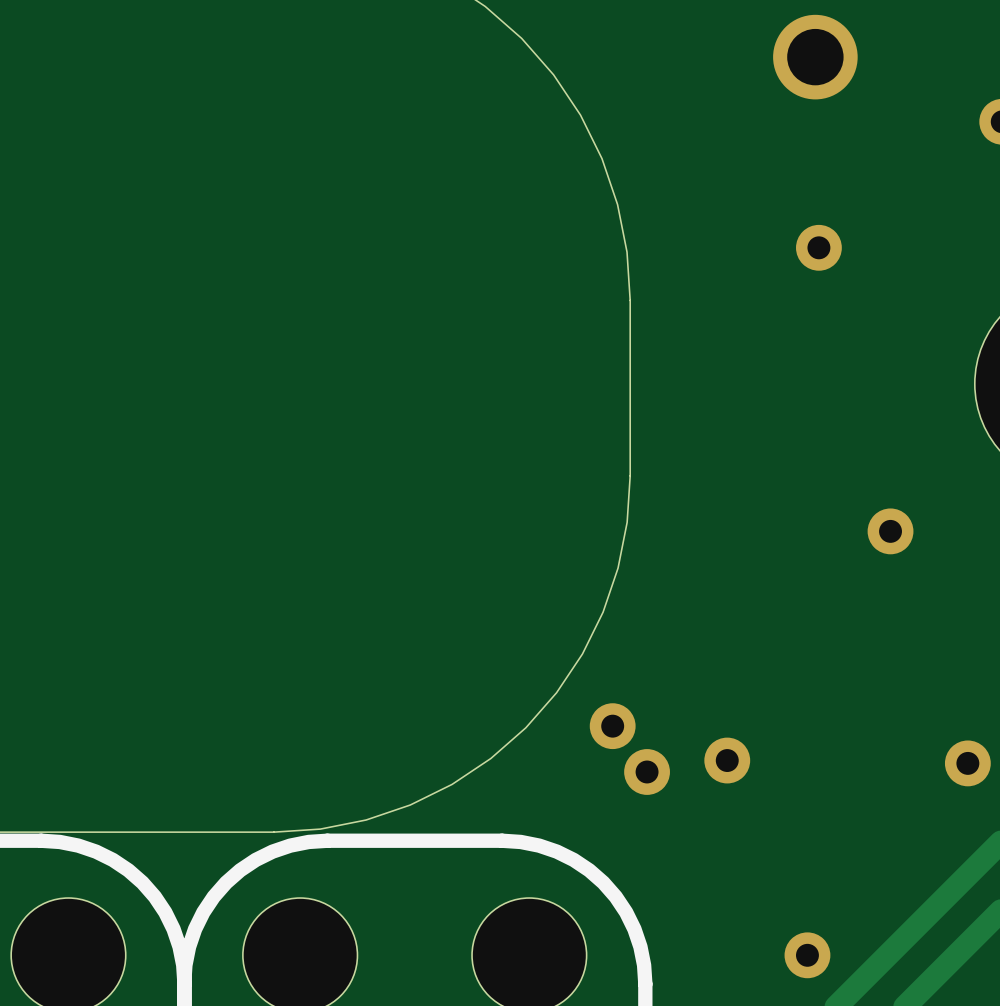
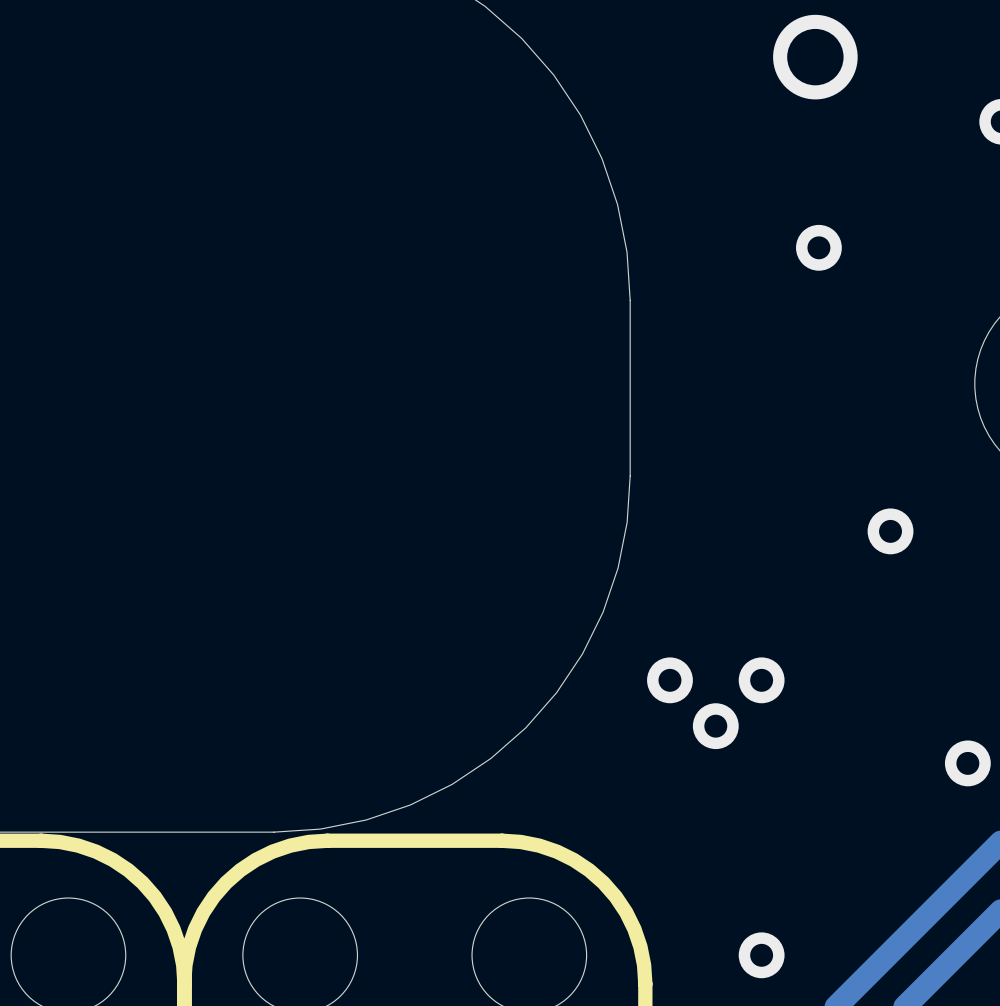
via: none -> (669, 680)
via: none -> (761, 680)
via: (612, 726) -> none
via position: (727, 760) -> (715, 726)
via: (647, 771) -> none
via position: (807, 955) -> (761, 955)

